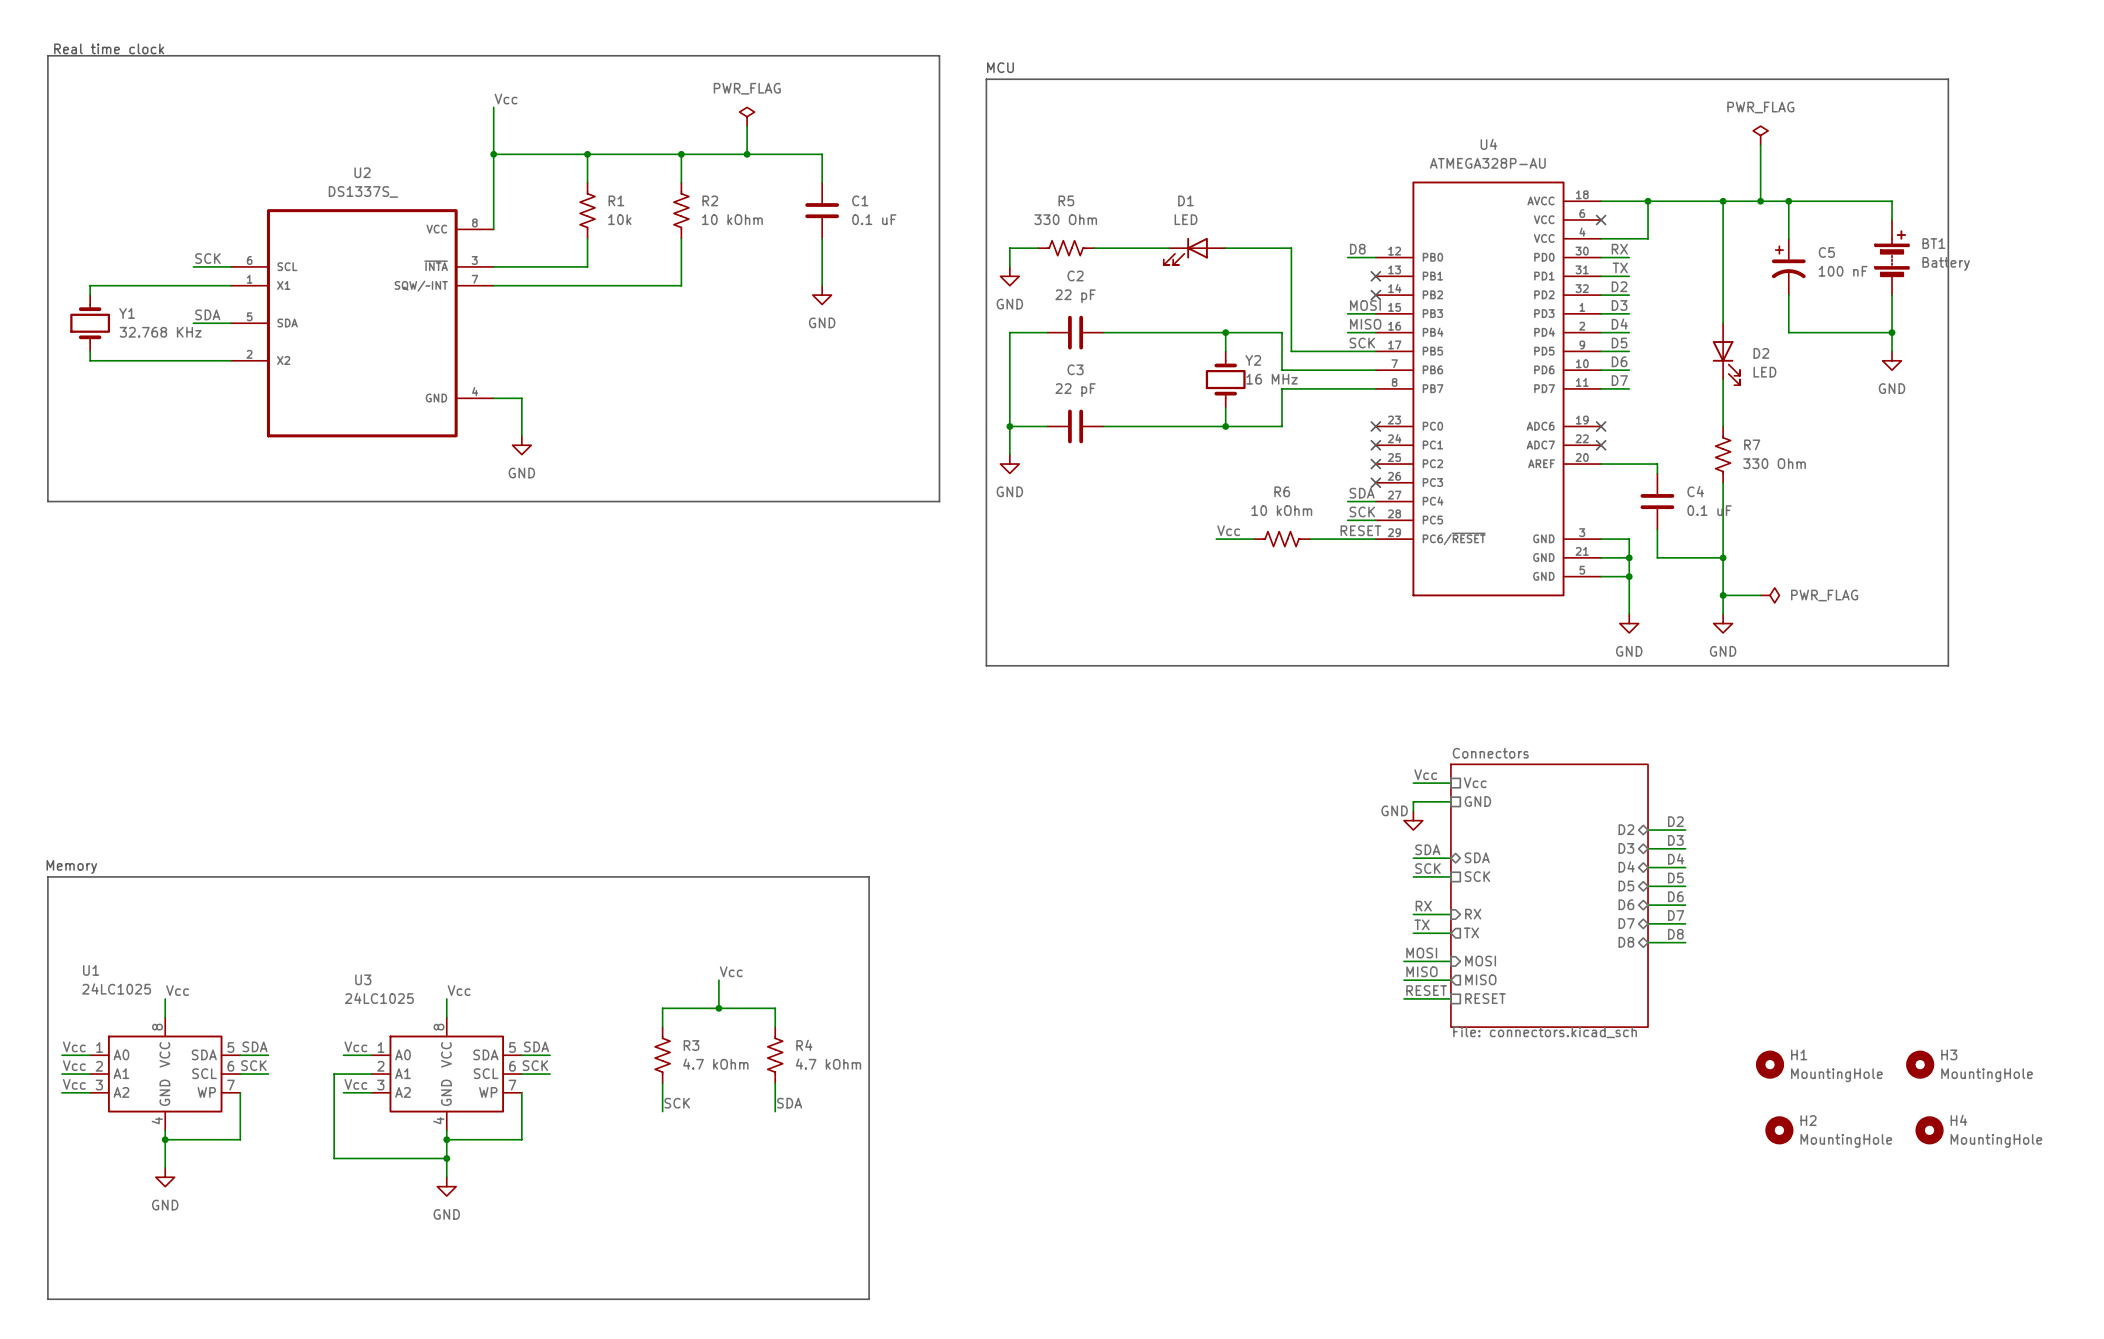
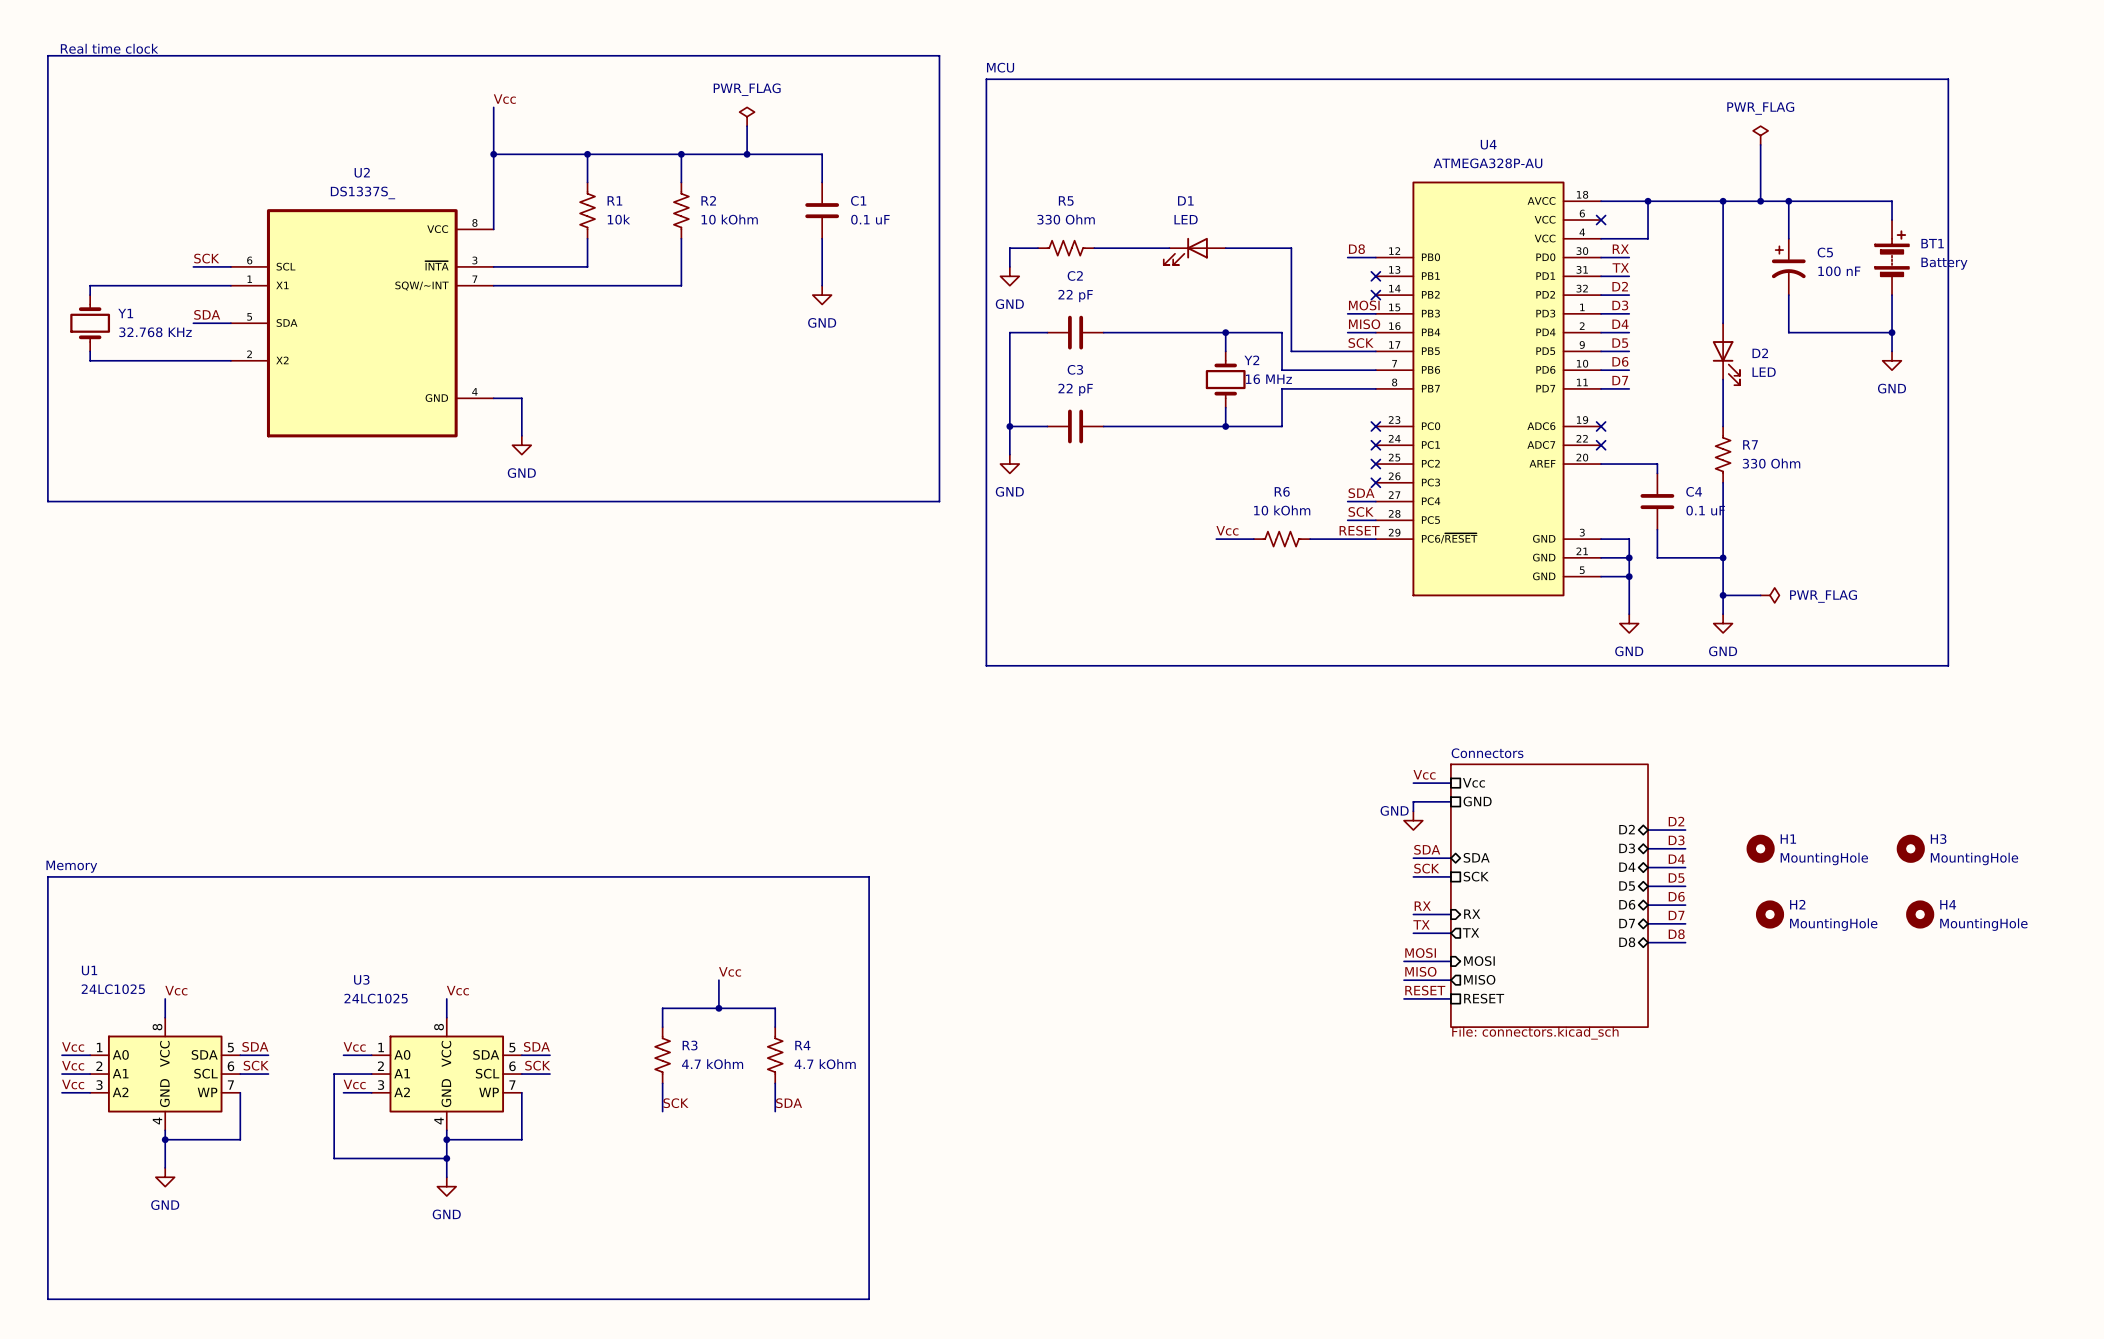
H1 position: (1770, 1064) -> (1760, 848)
H3 position: (1920, 1064) -> (1910, 848)
H2 position: (1779, 1130) -> (1770, 914)
H4 position: (1929, 1130) -> (1920, 914)

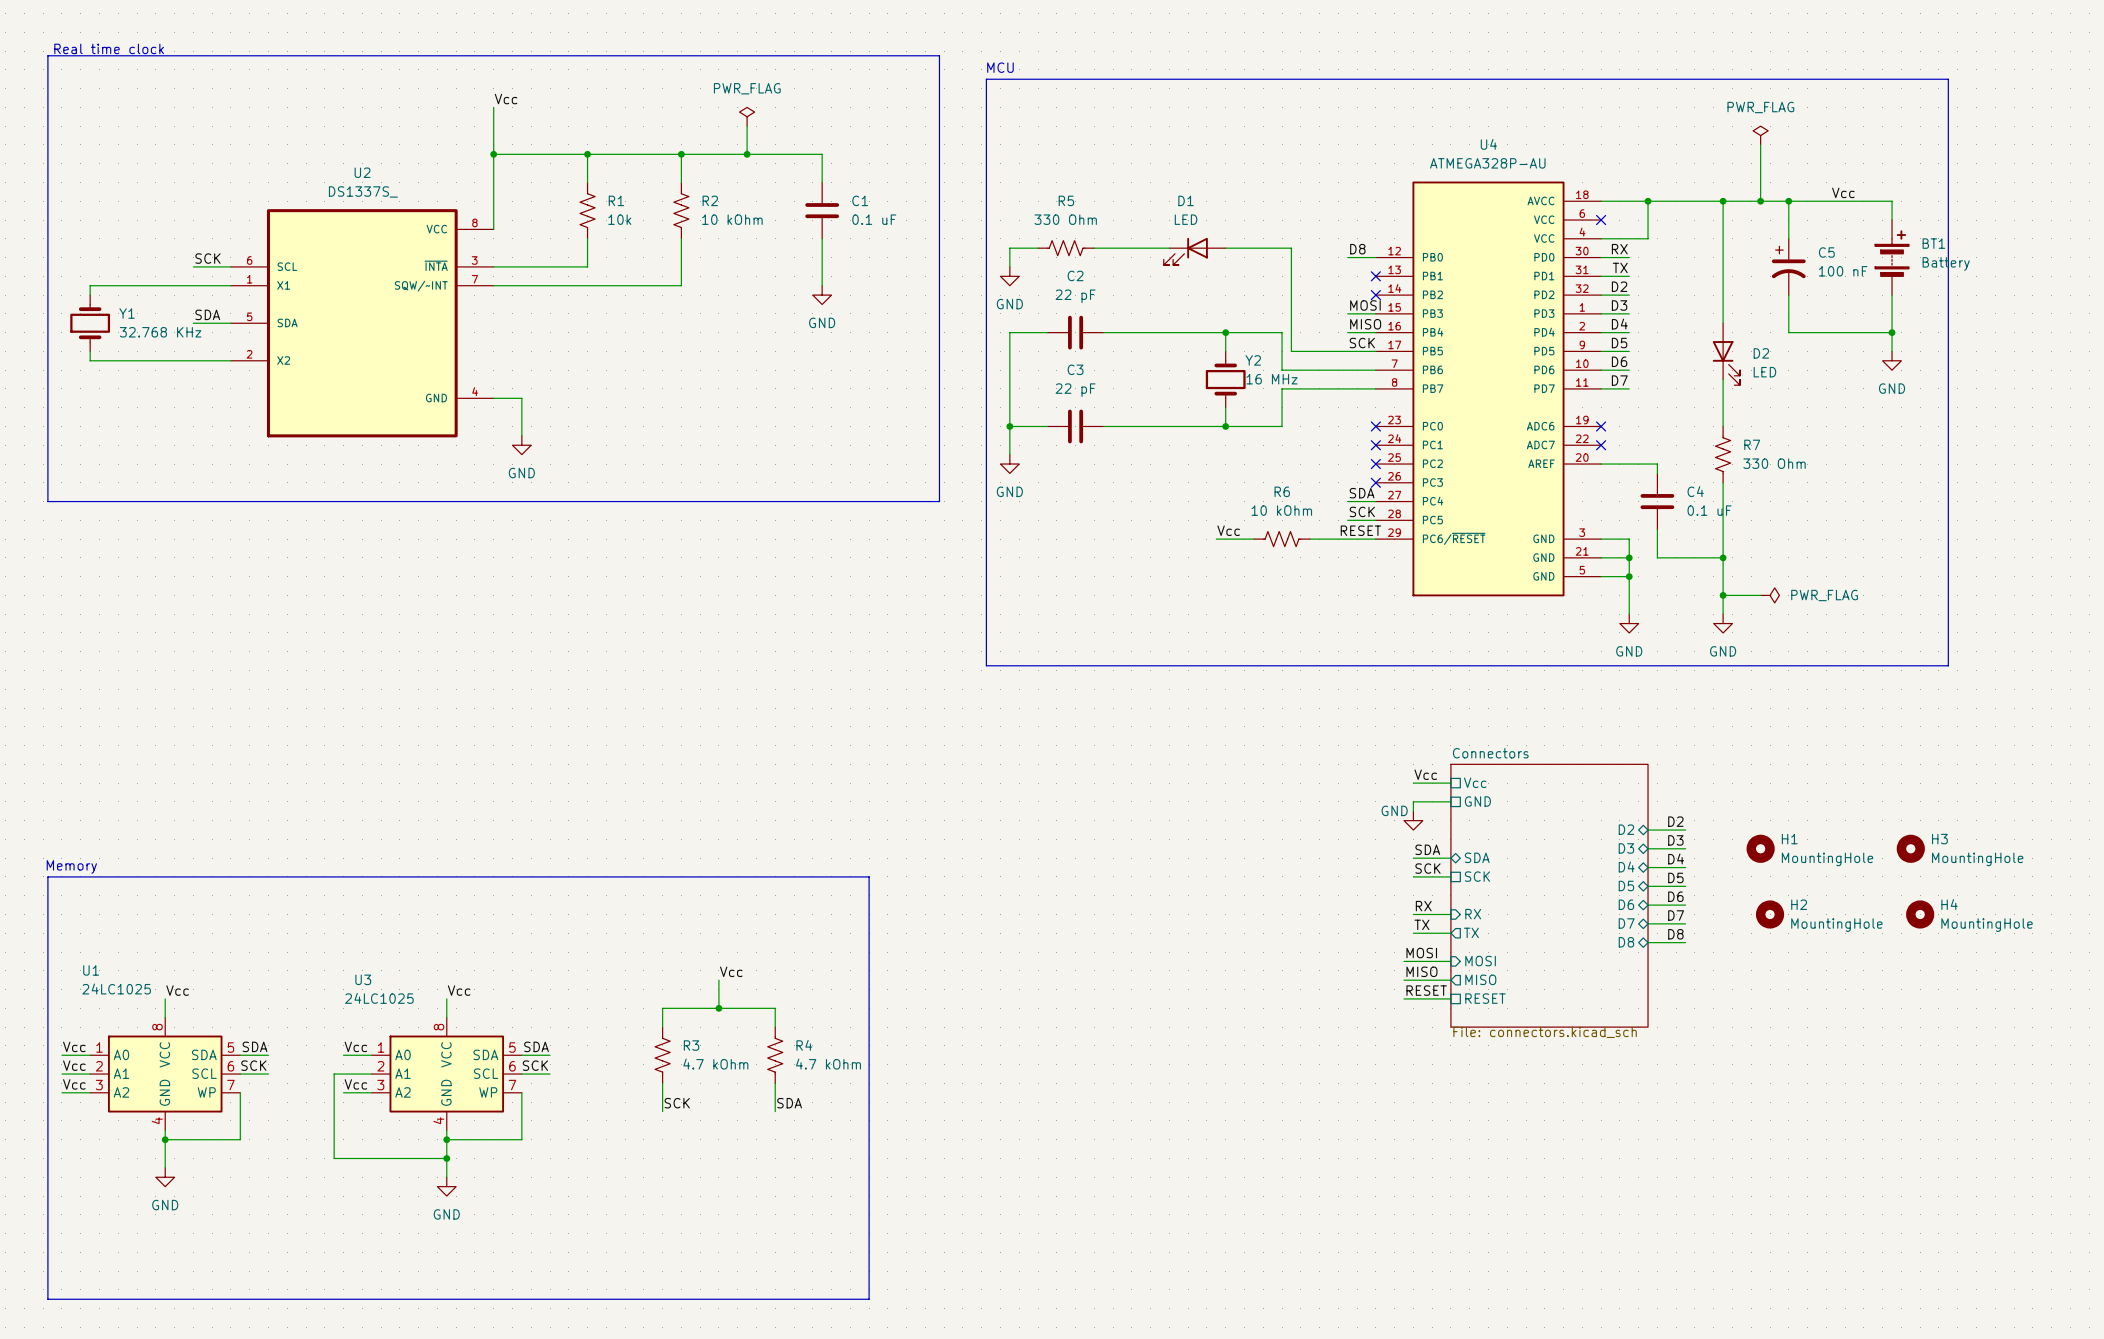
label: none -> Vcc (1843, 192)

